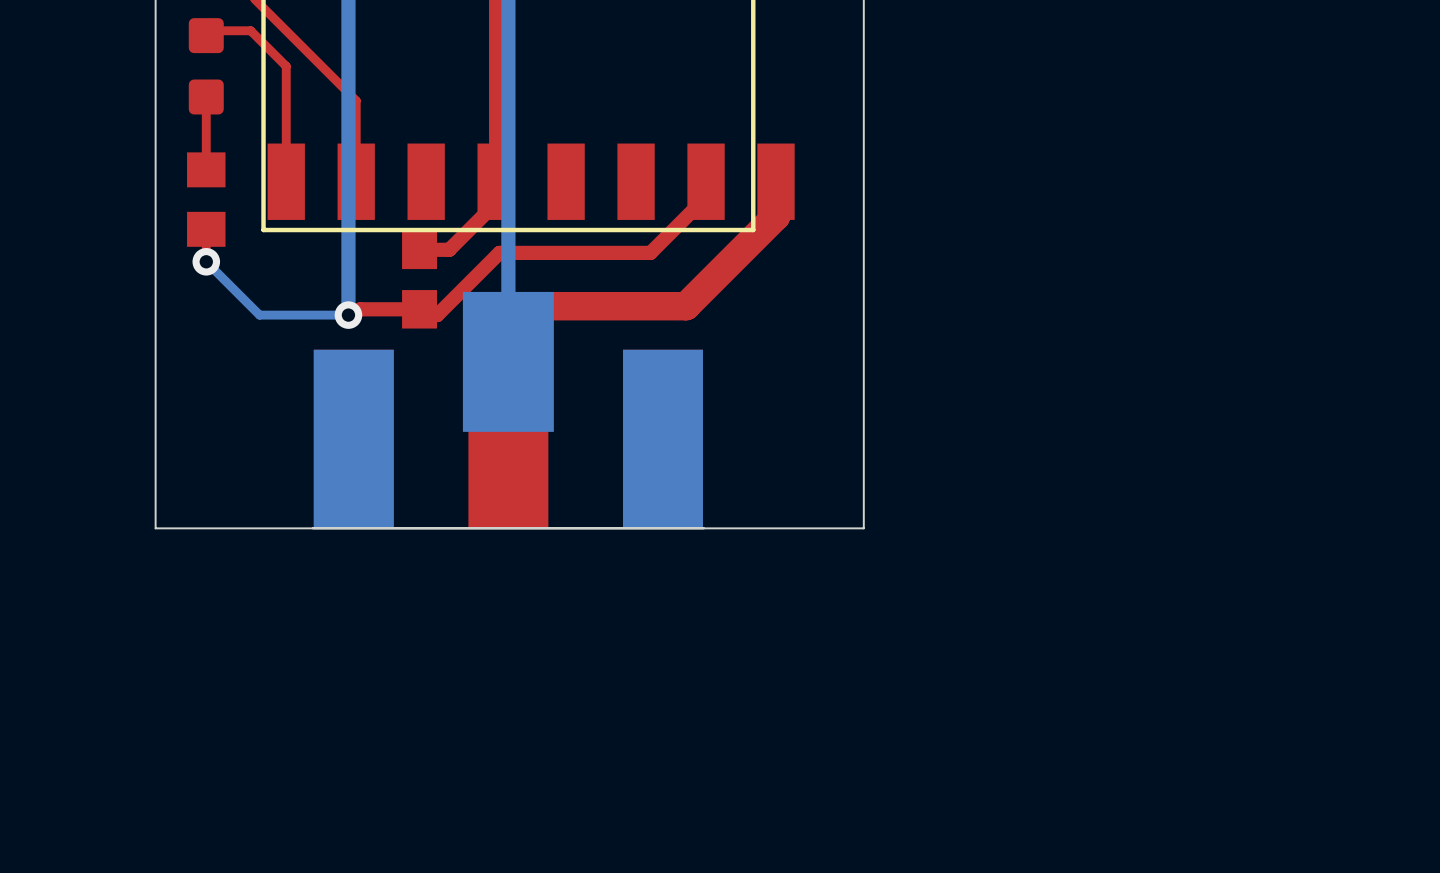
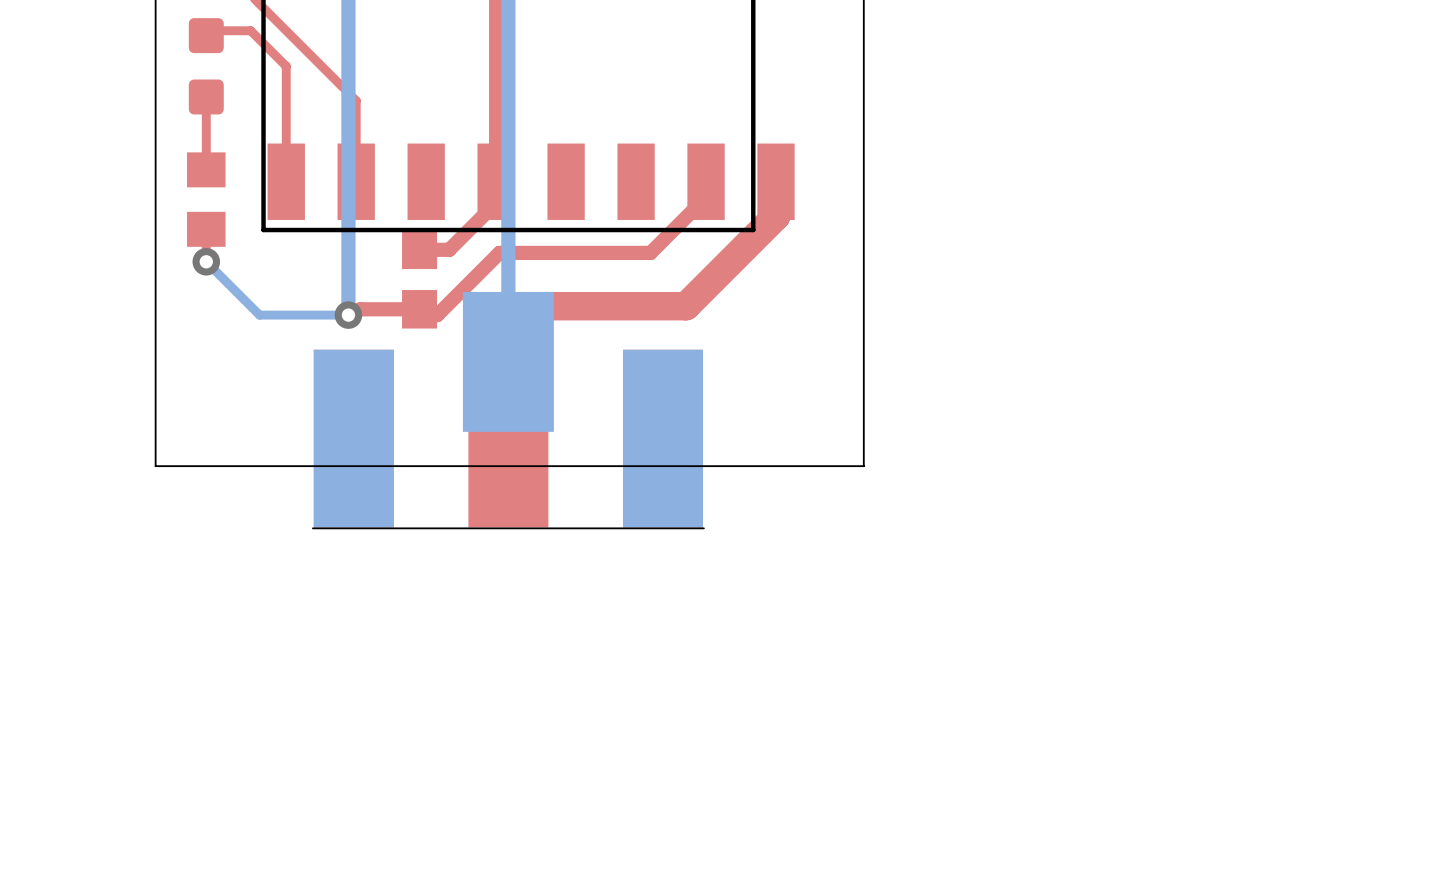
board edge: (863, 466) (863, 528) (155, 528) (155, 466) -> (863, 466) (155, 466)

